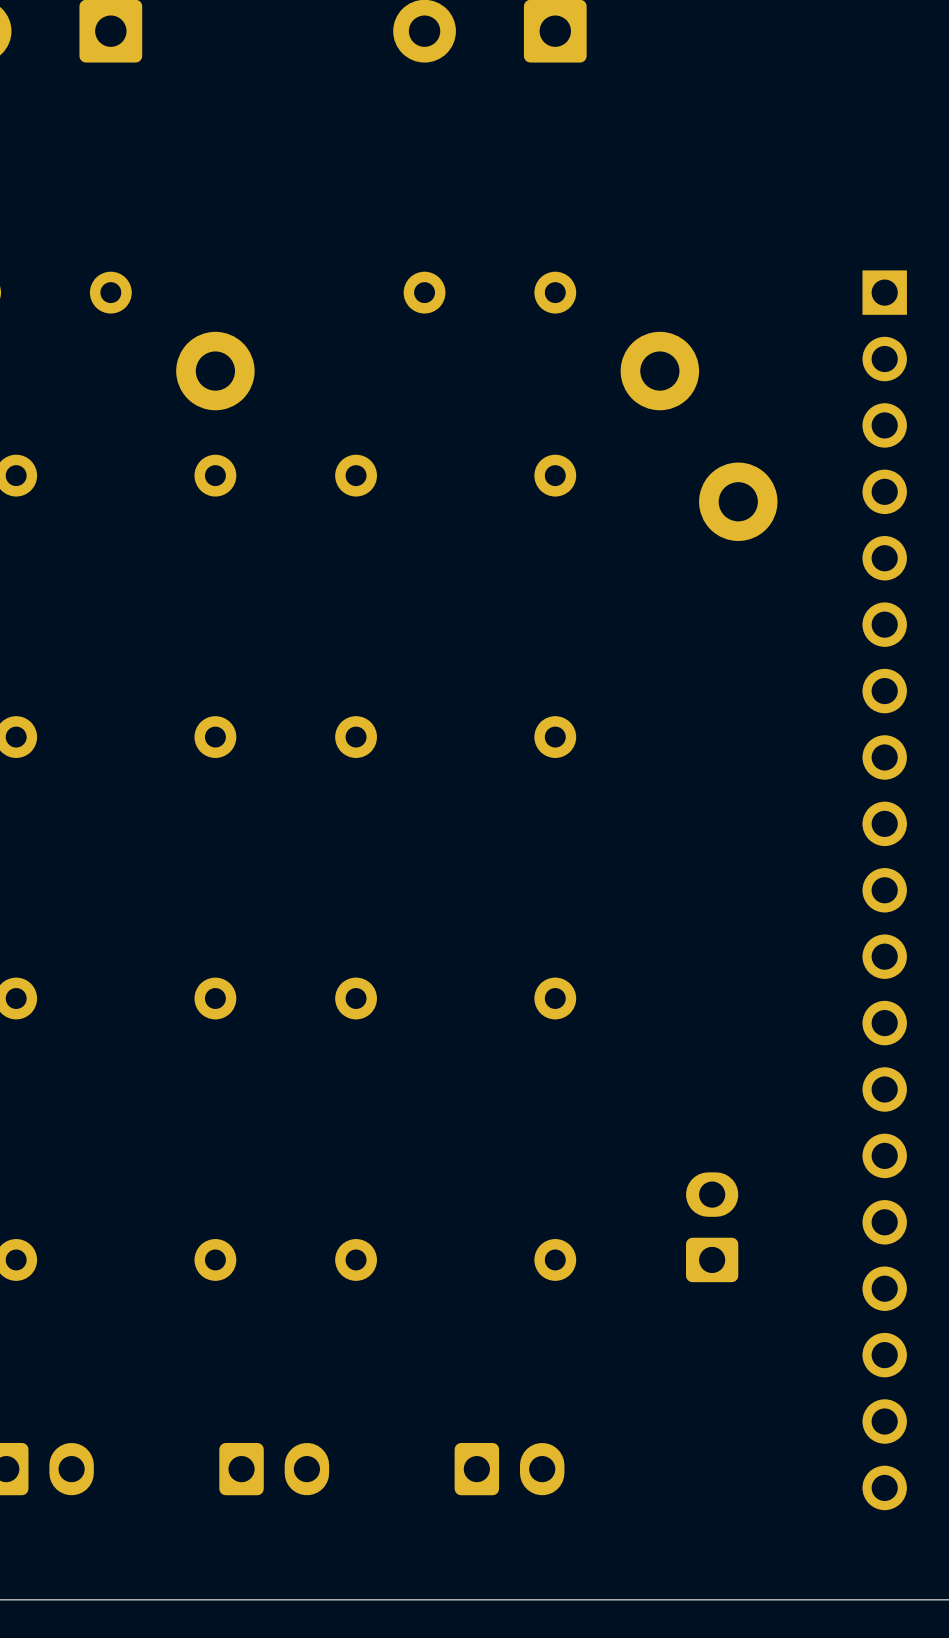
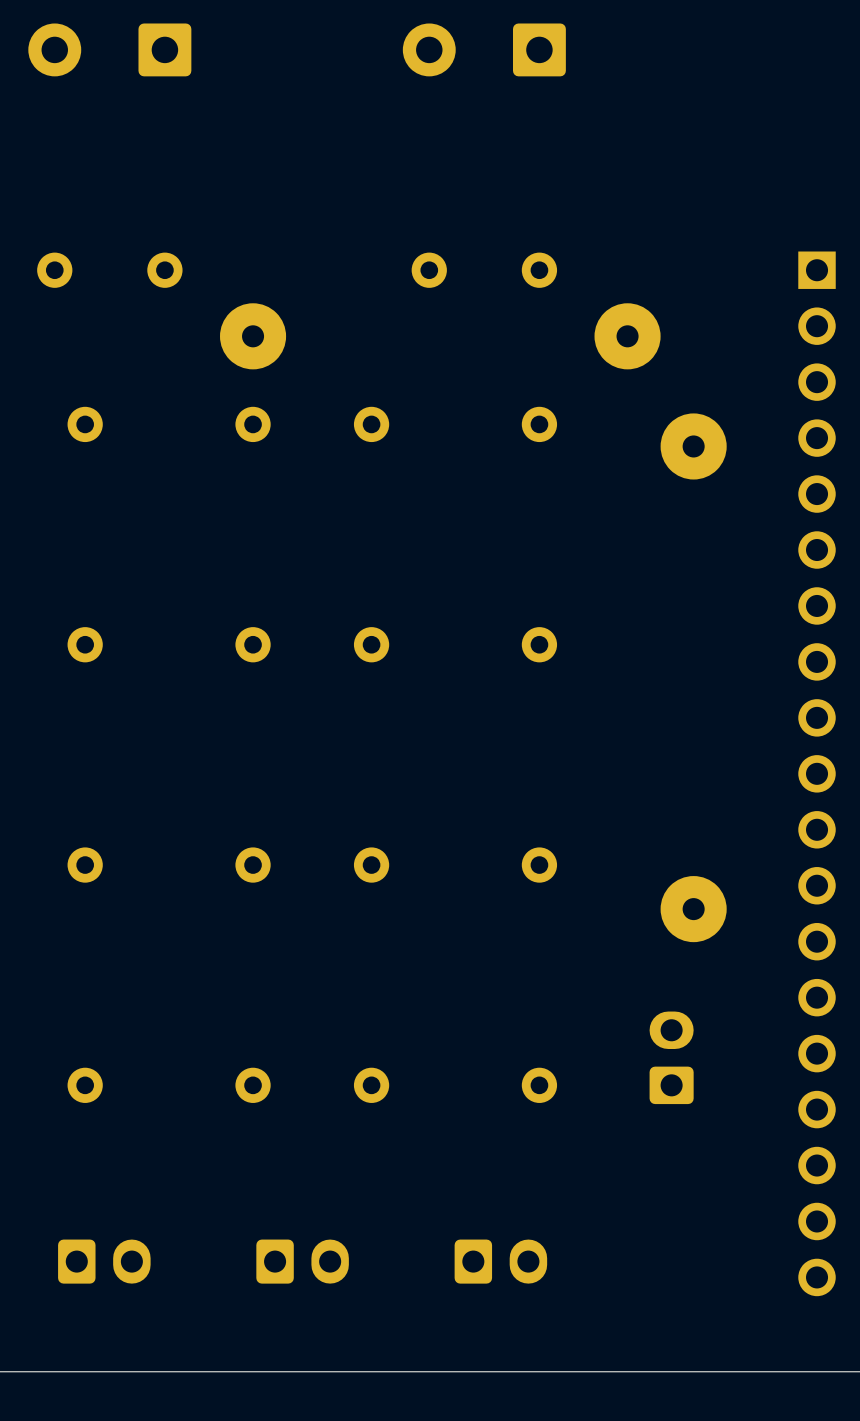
part footprint: [176, 331, 255, 411] -> [219, 303, 287, 370]
part footprint: [620, 331, 700, 411] -> [594, 303, 661, 370]
part footprint: [699, 462, 778, 541] -> [660, 413, 727, 480]
part: none -> (693, 909)

